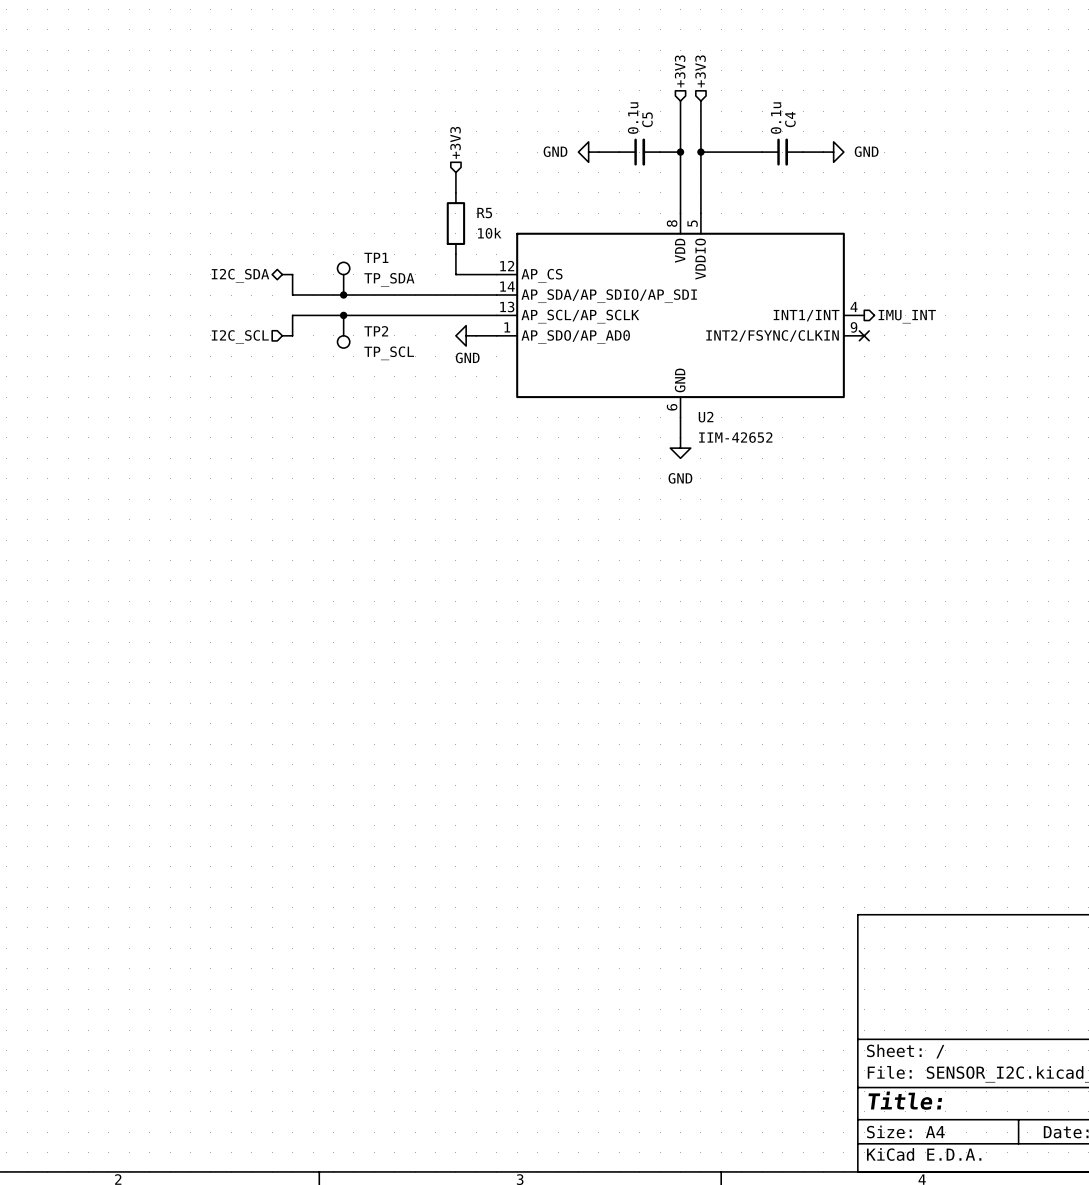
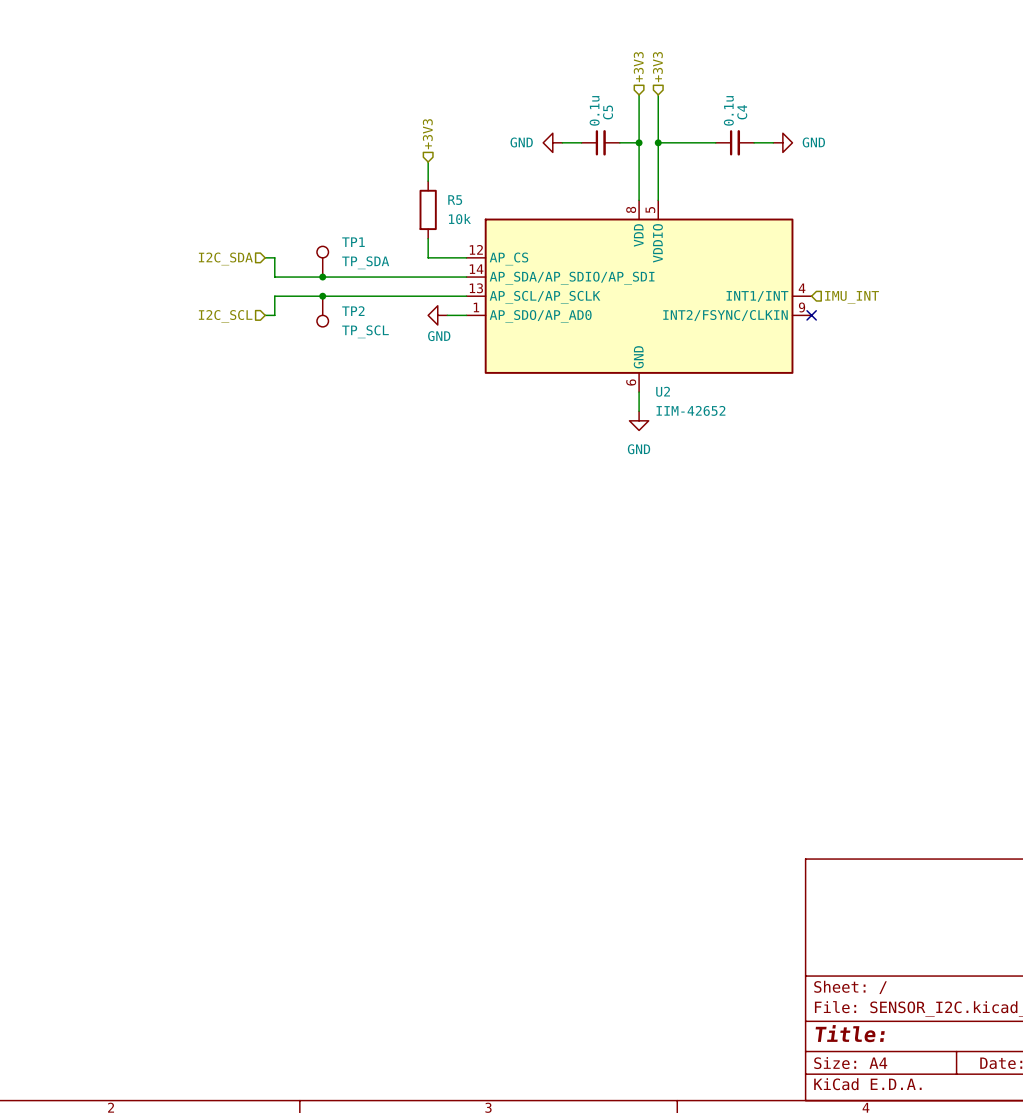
hierarchical label shape: bidirectional (240, 275) -> input (225, 258)
hierarchical label shape: output (907, 316) -> input (852, 297)

